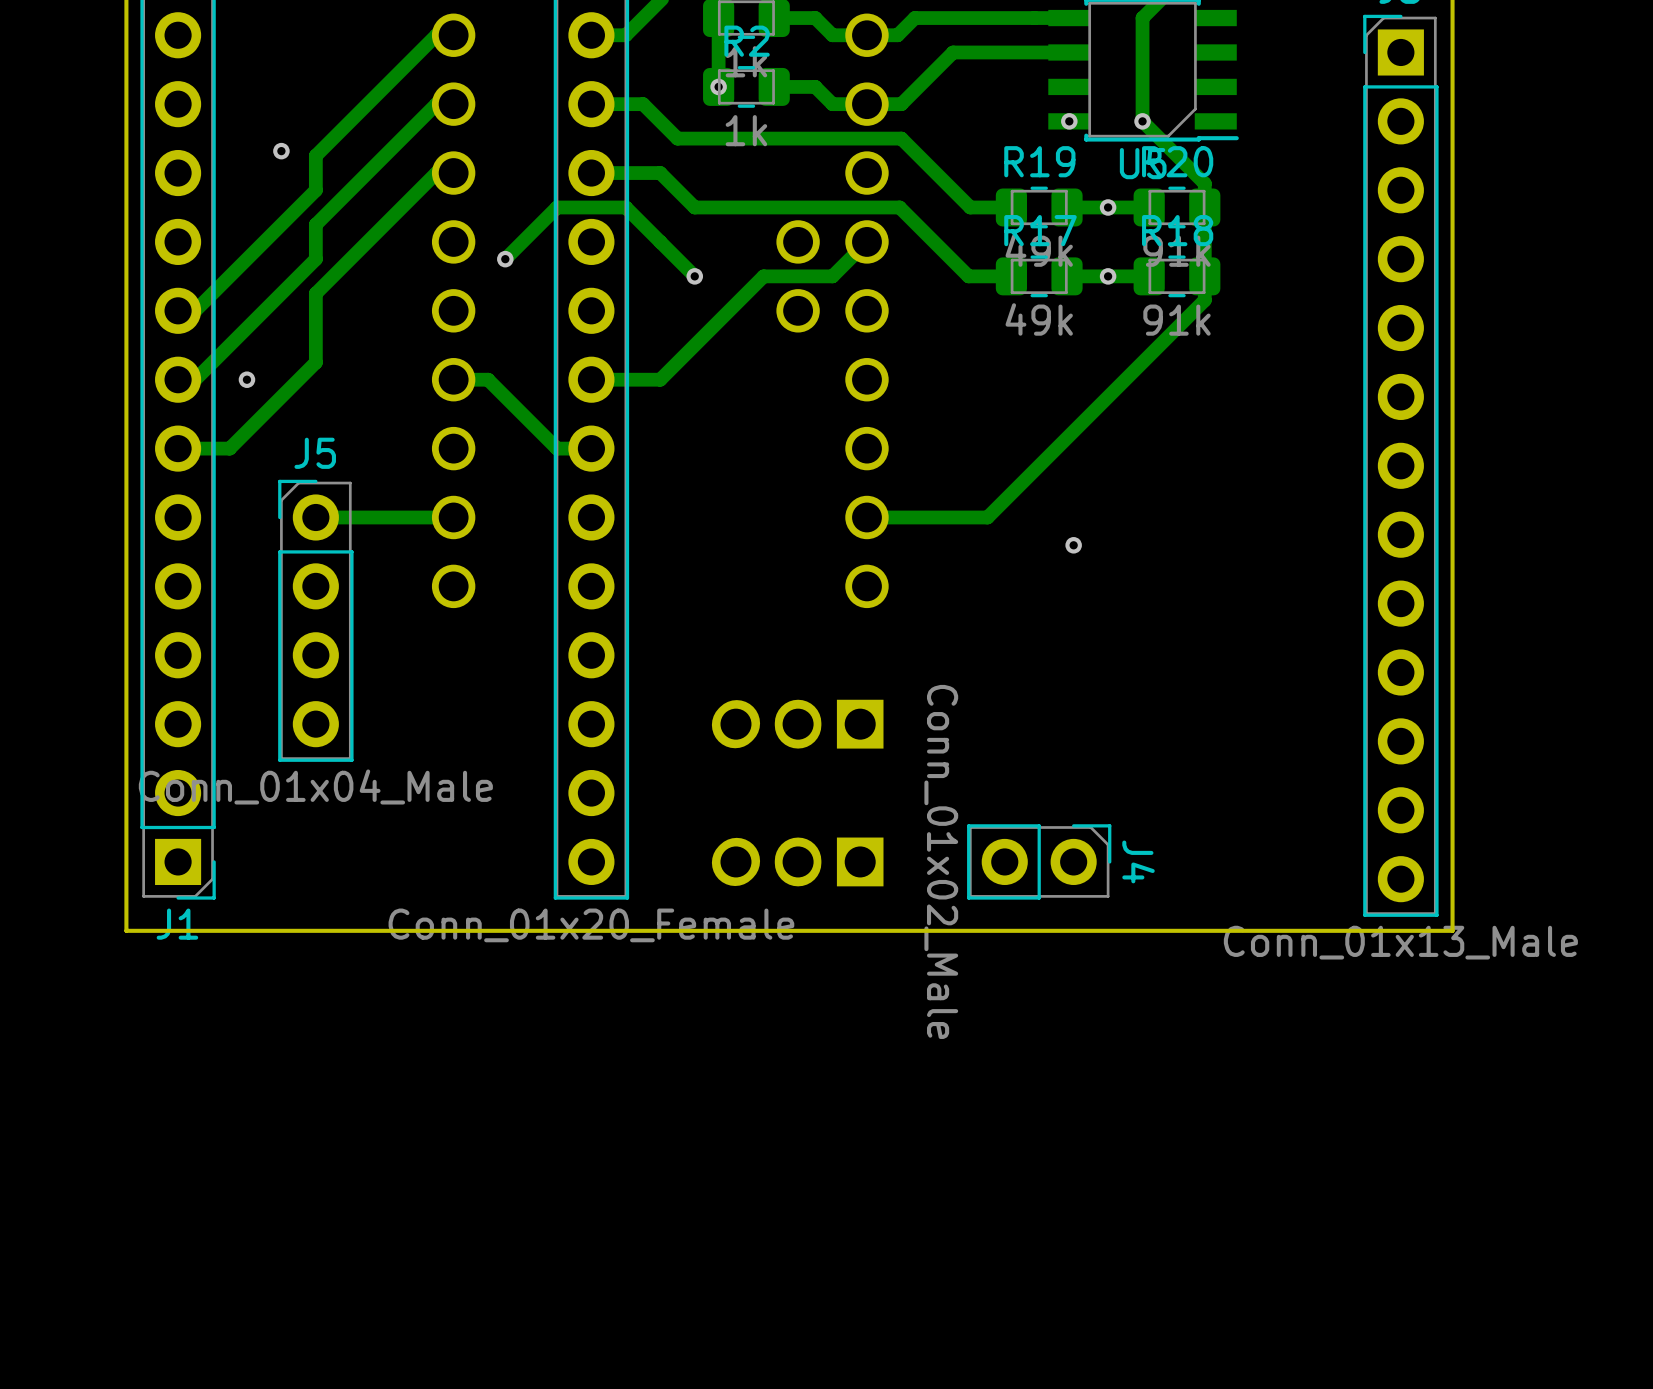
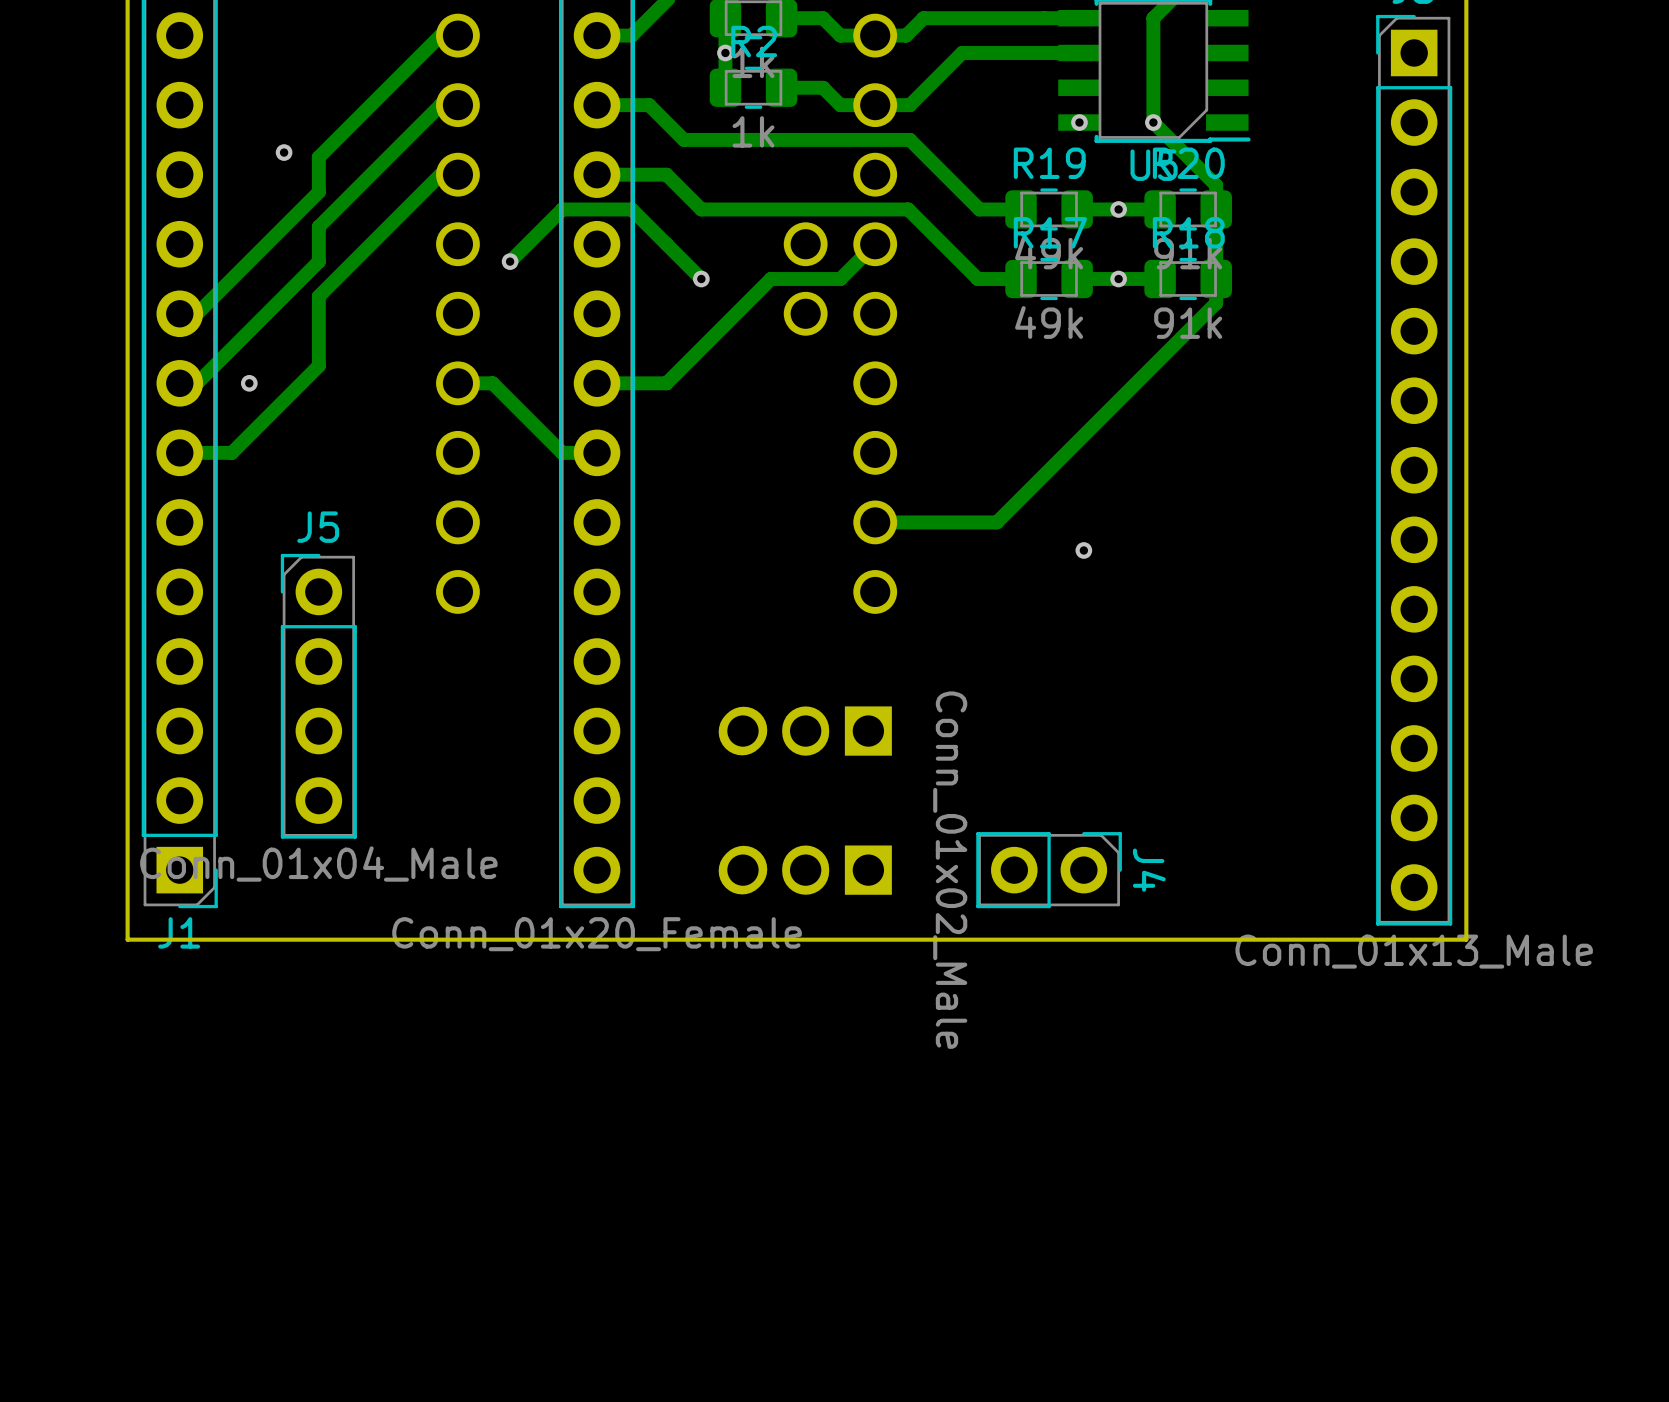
via position: (718, 86) -> (725, 52)
track: (453, 517) (315, 517) -> none
J5 position: (315, 620) -> (318, 696)

